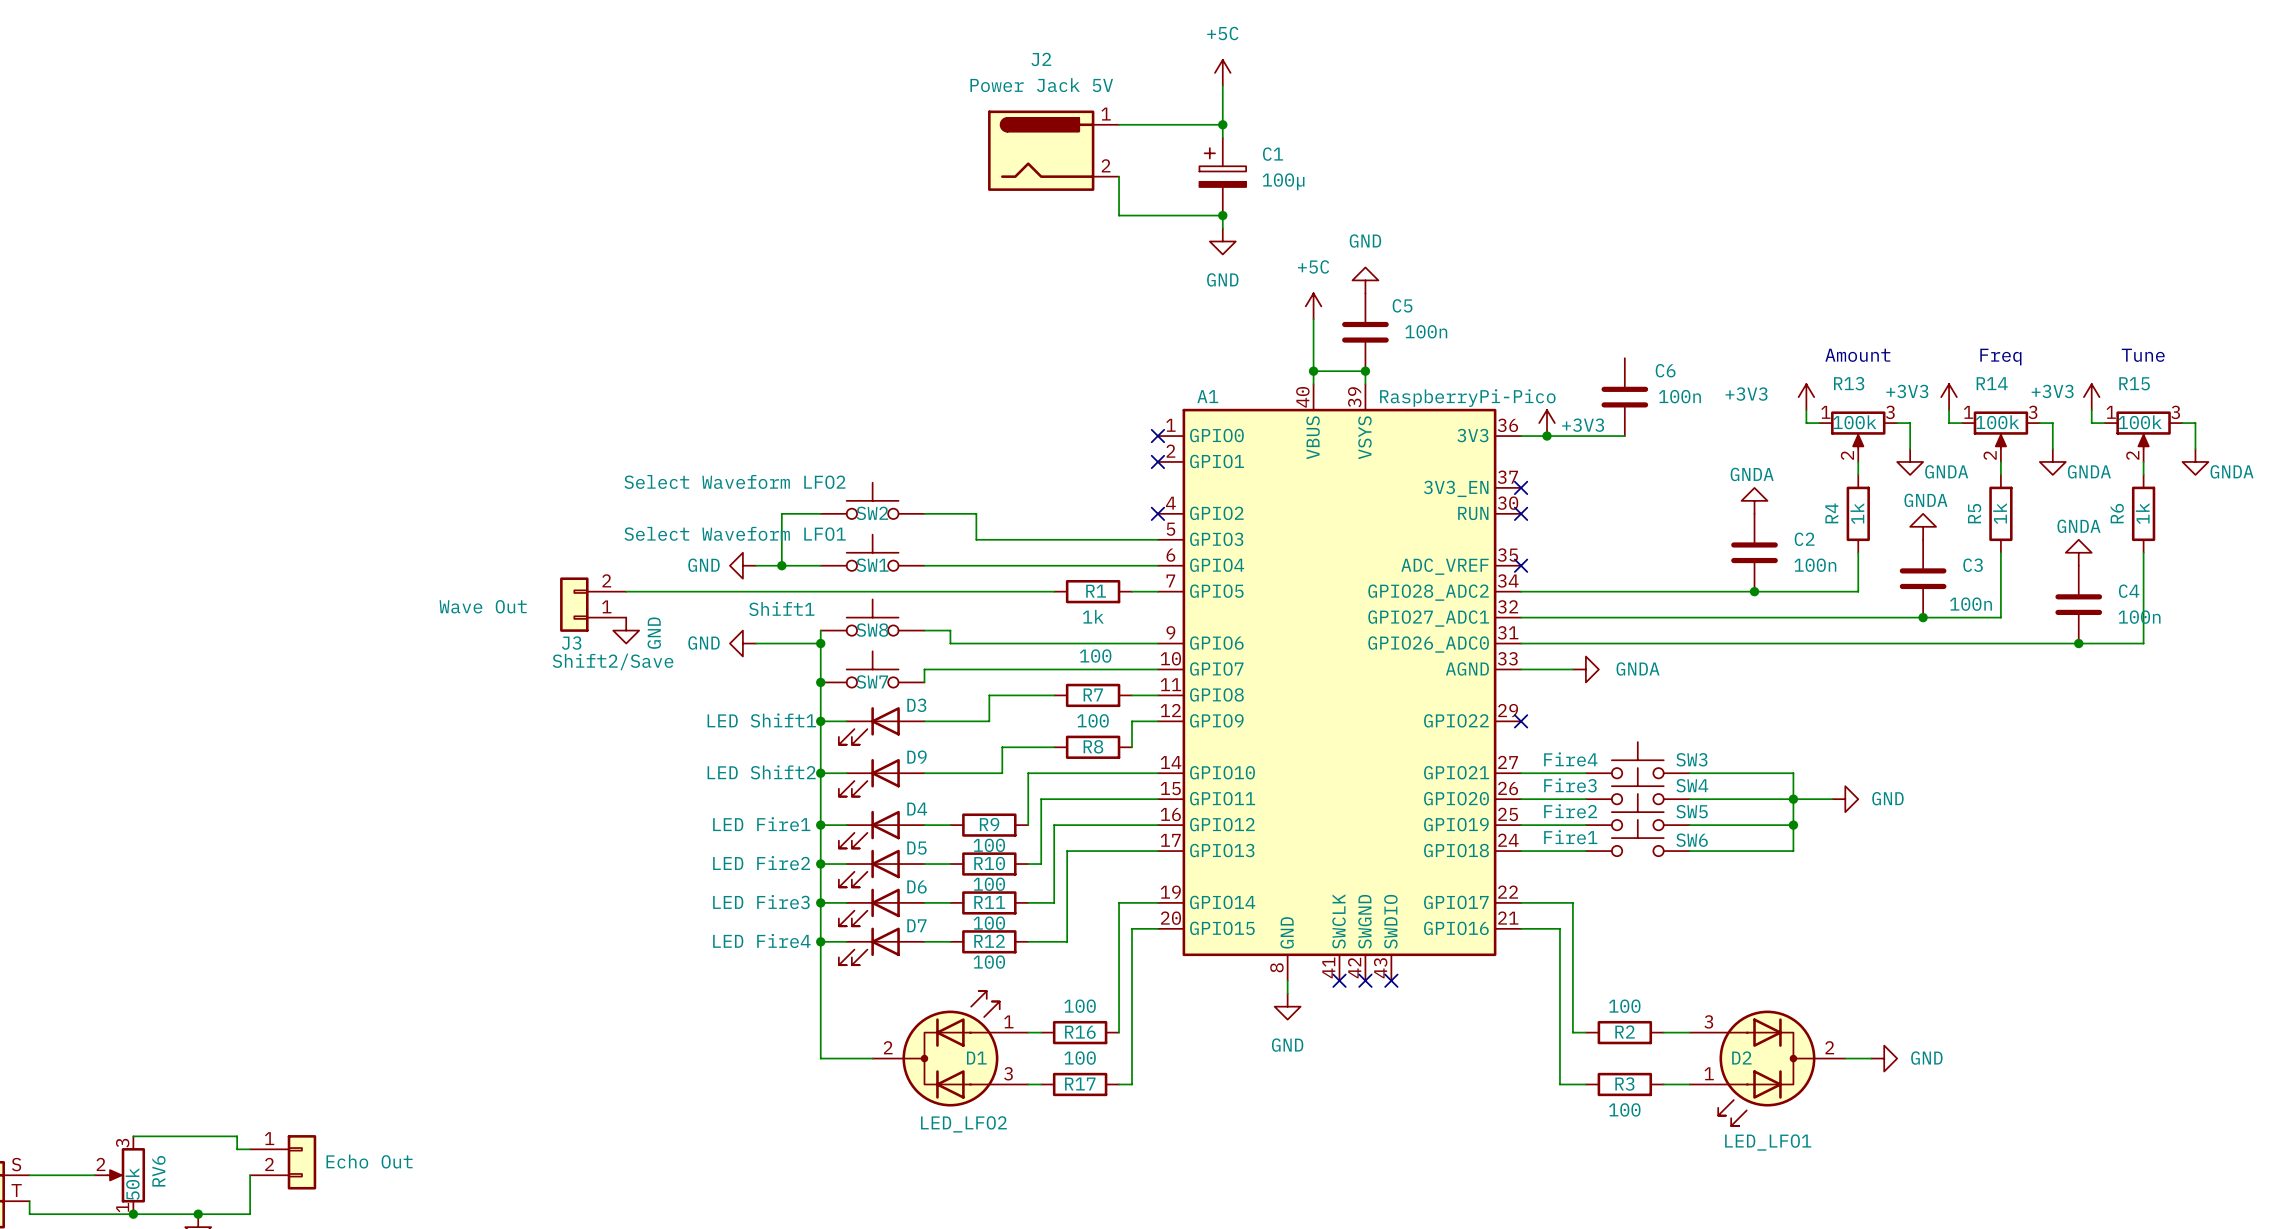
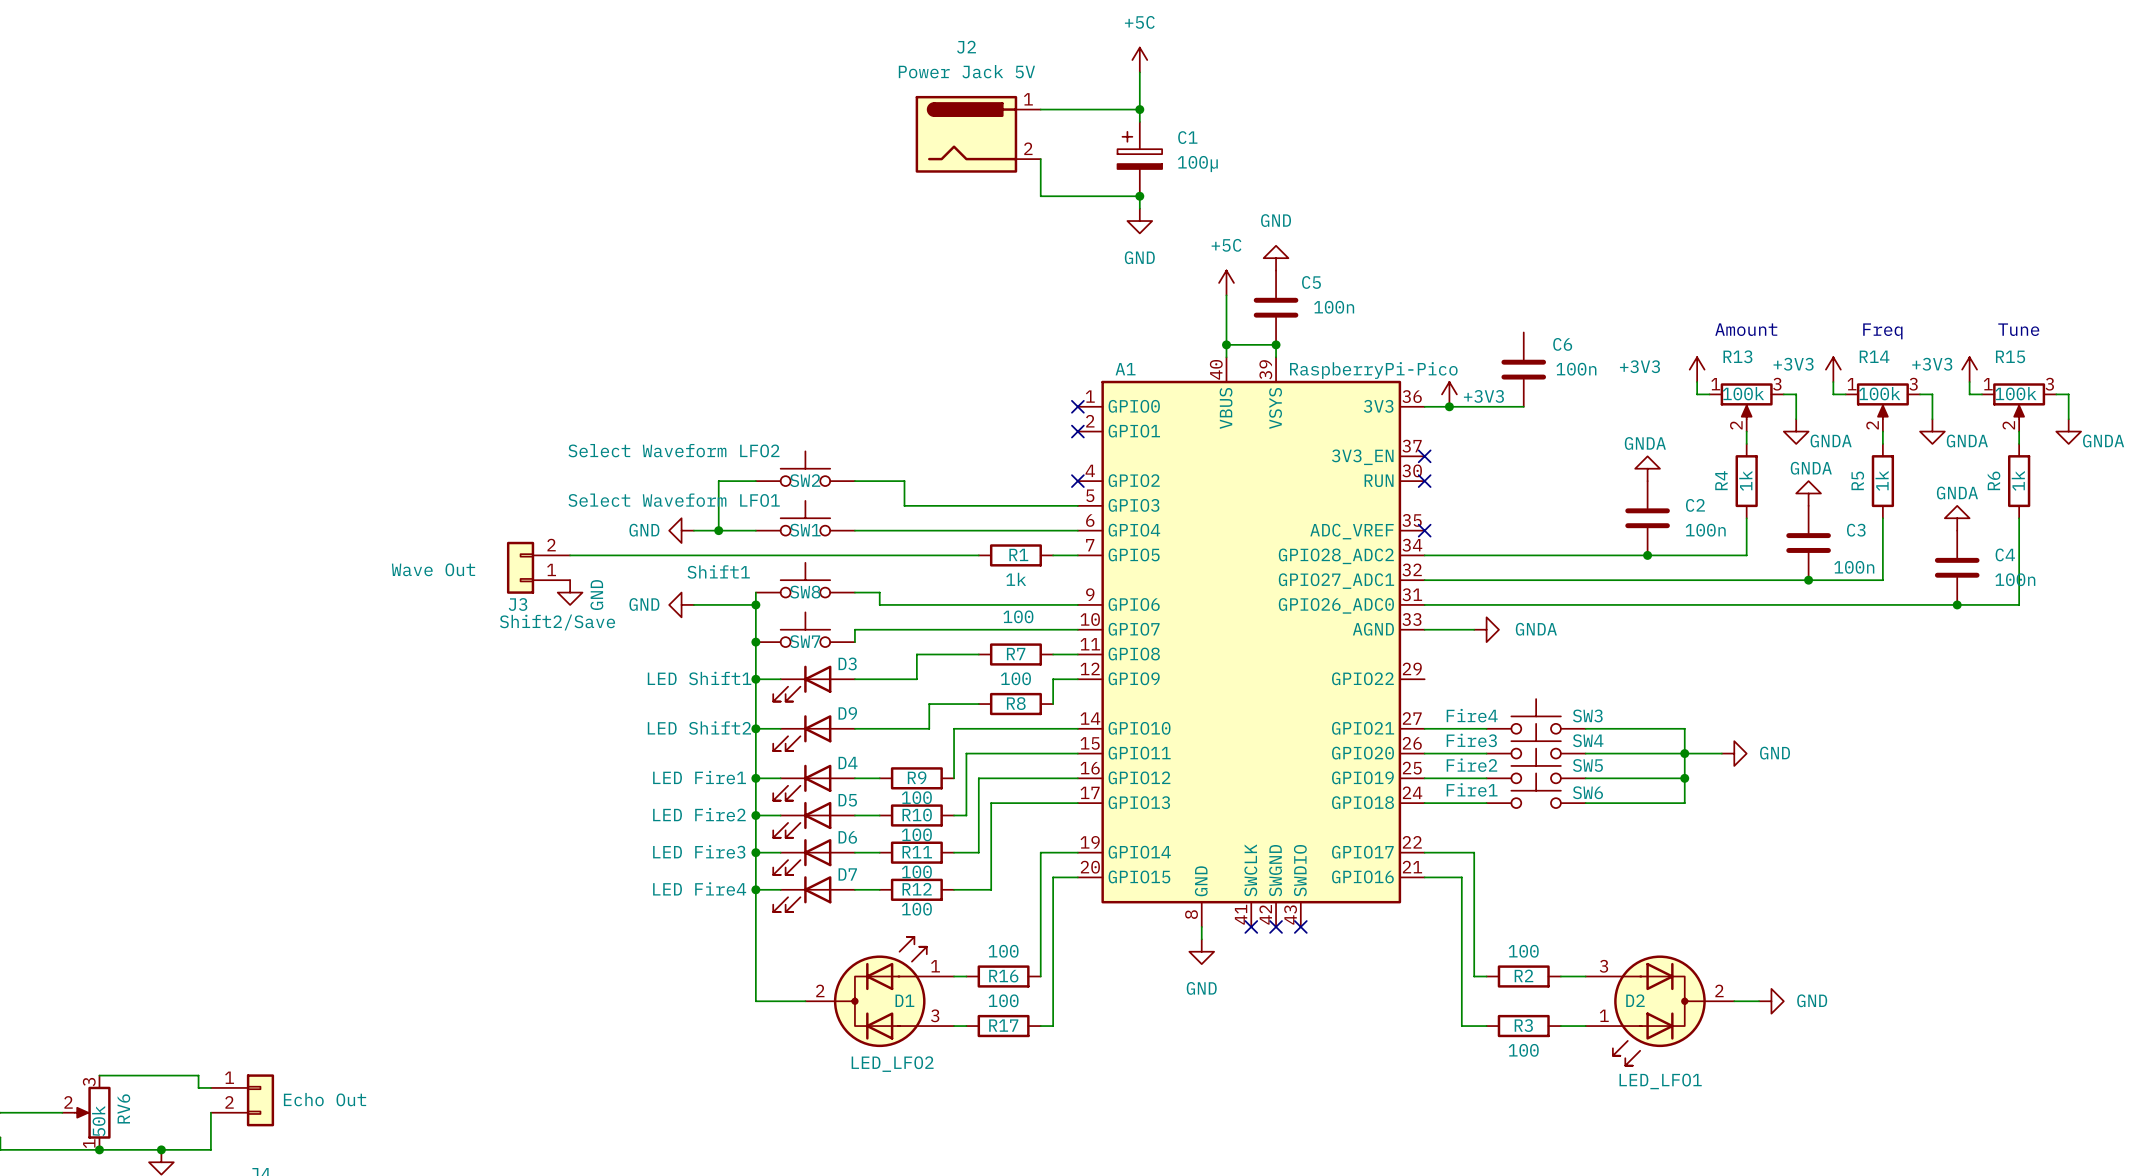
no-connect mark: (1521, 721) -> none

